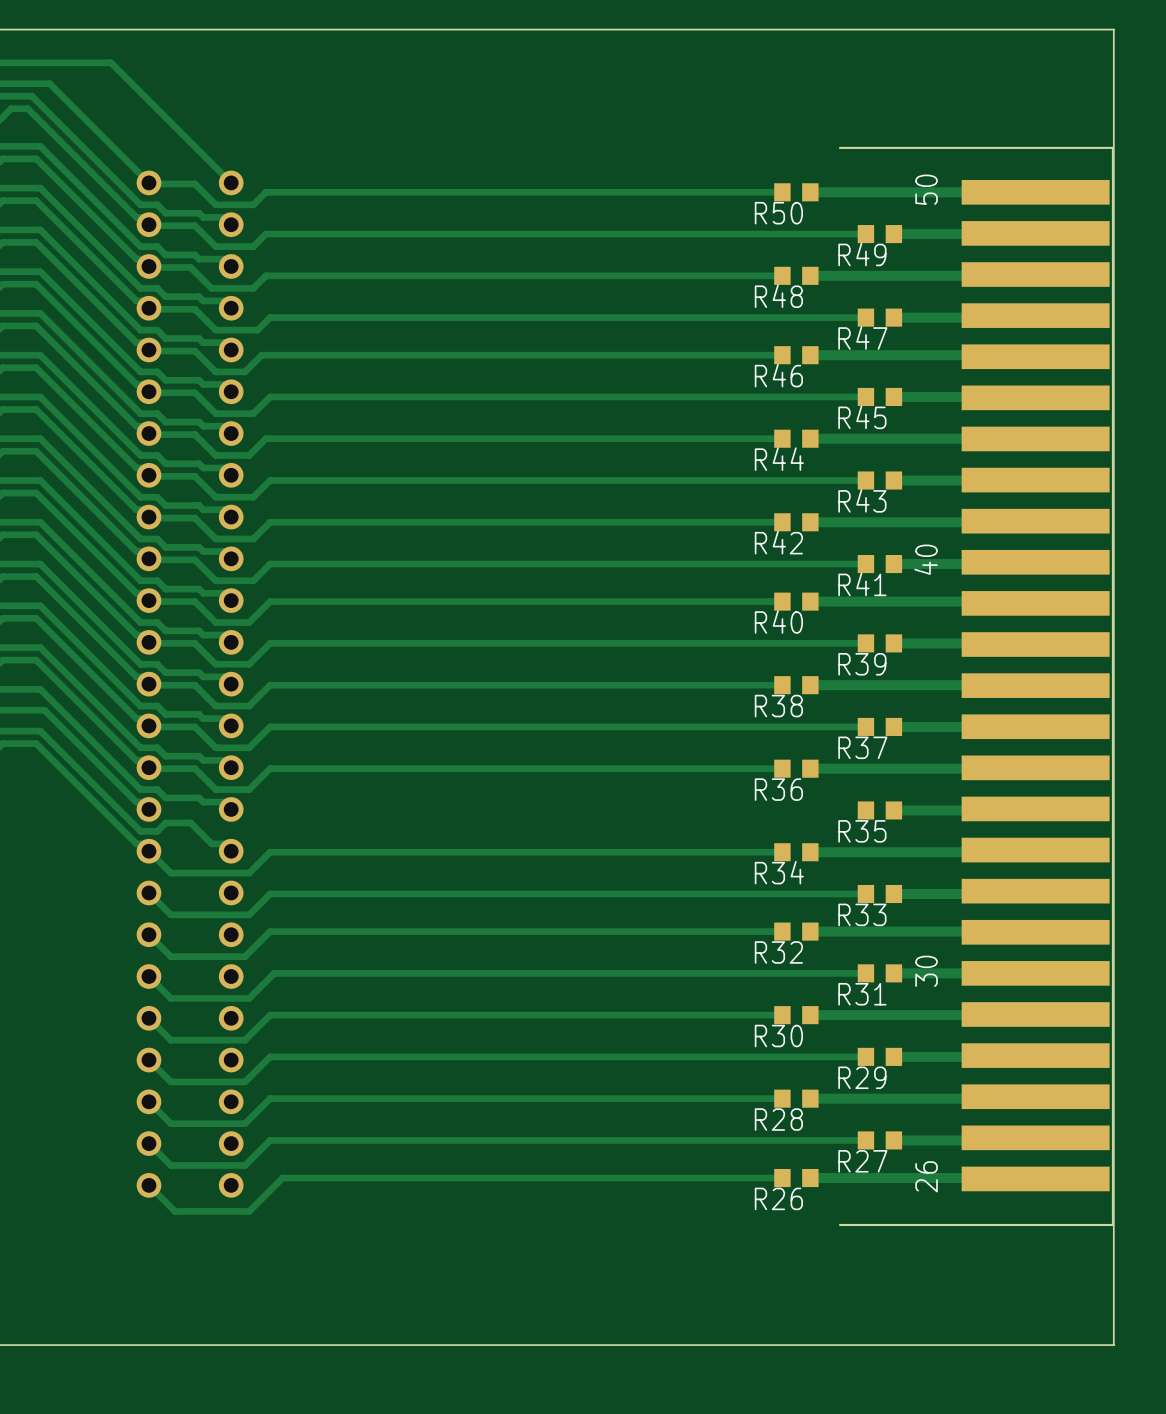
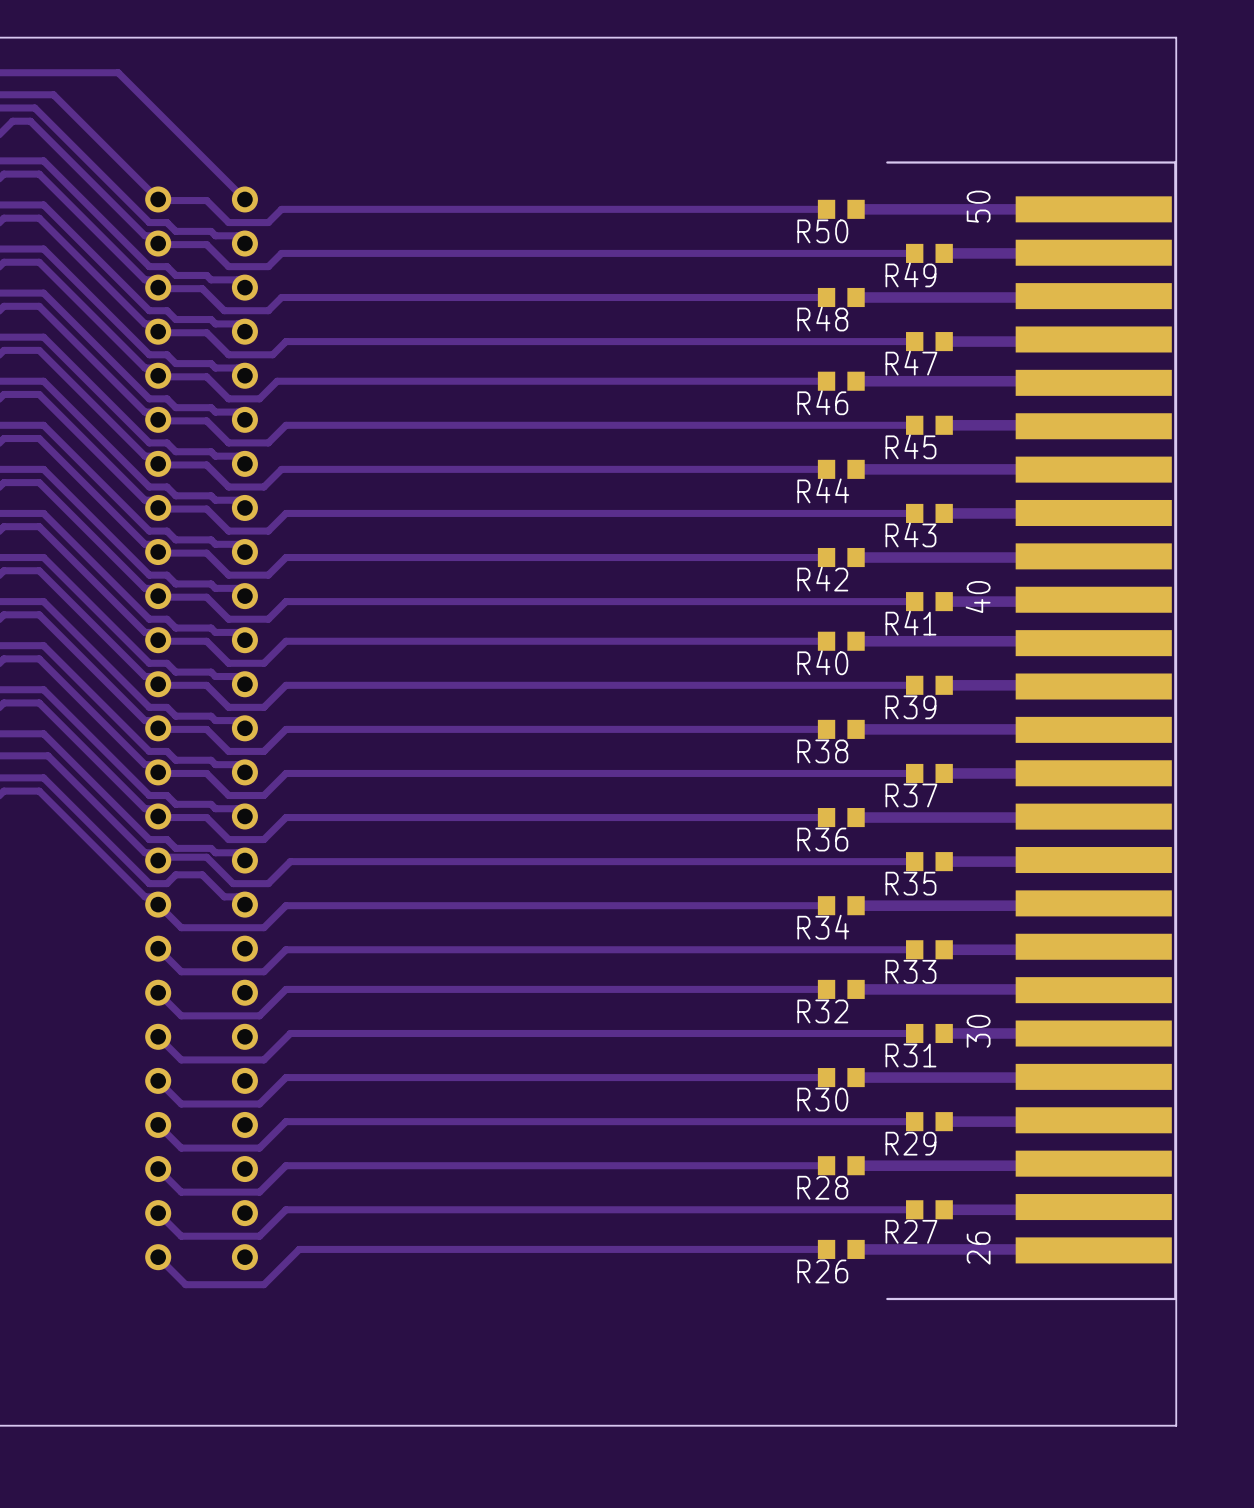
track: none -> (158, 857) (206, 857) (233, 883) (268, 883) (290, 861) (914, 861)

